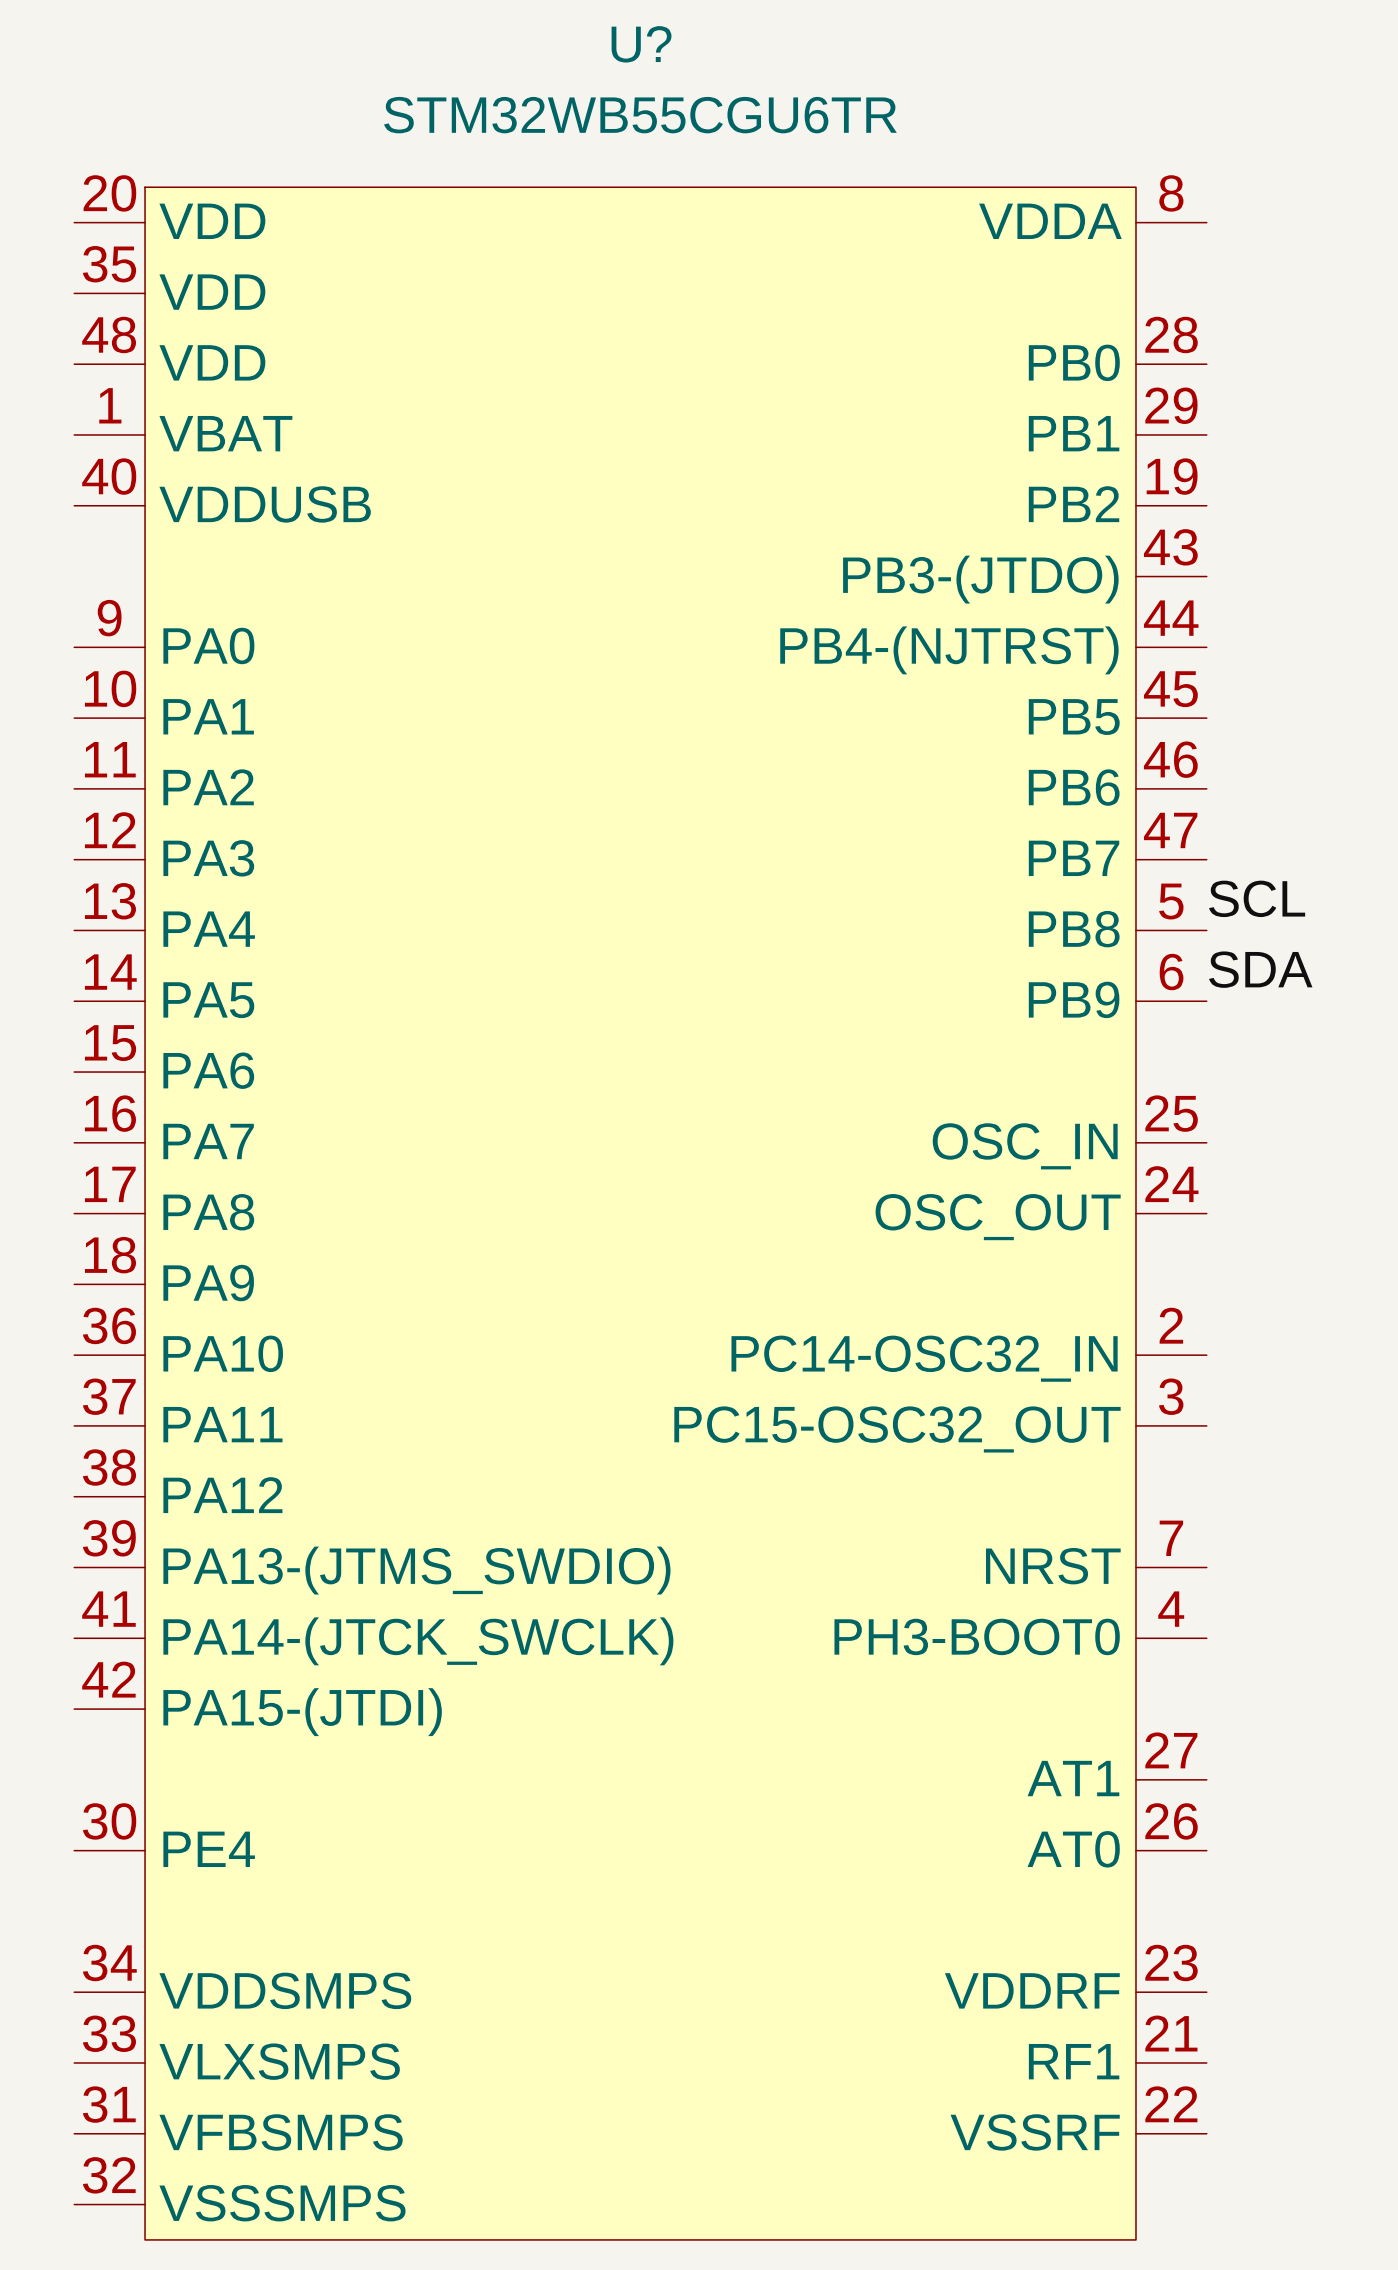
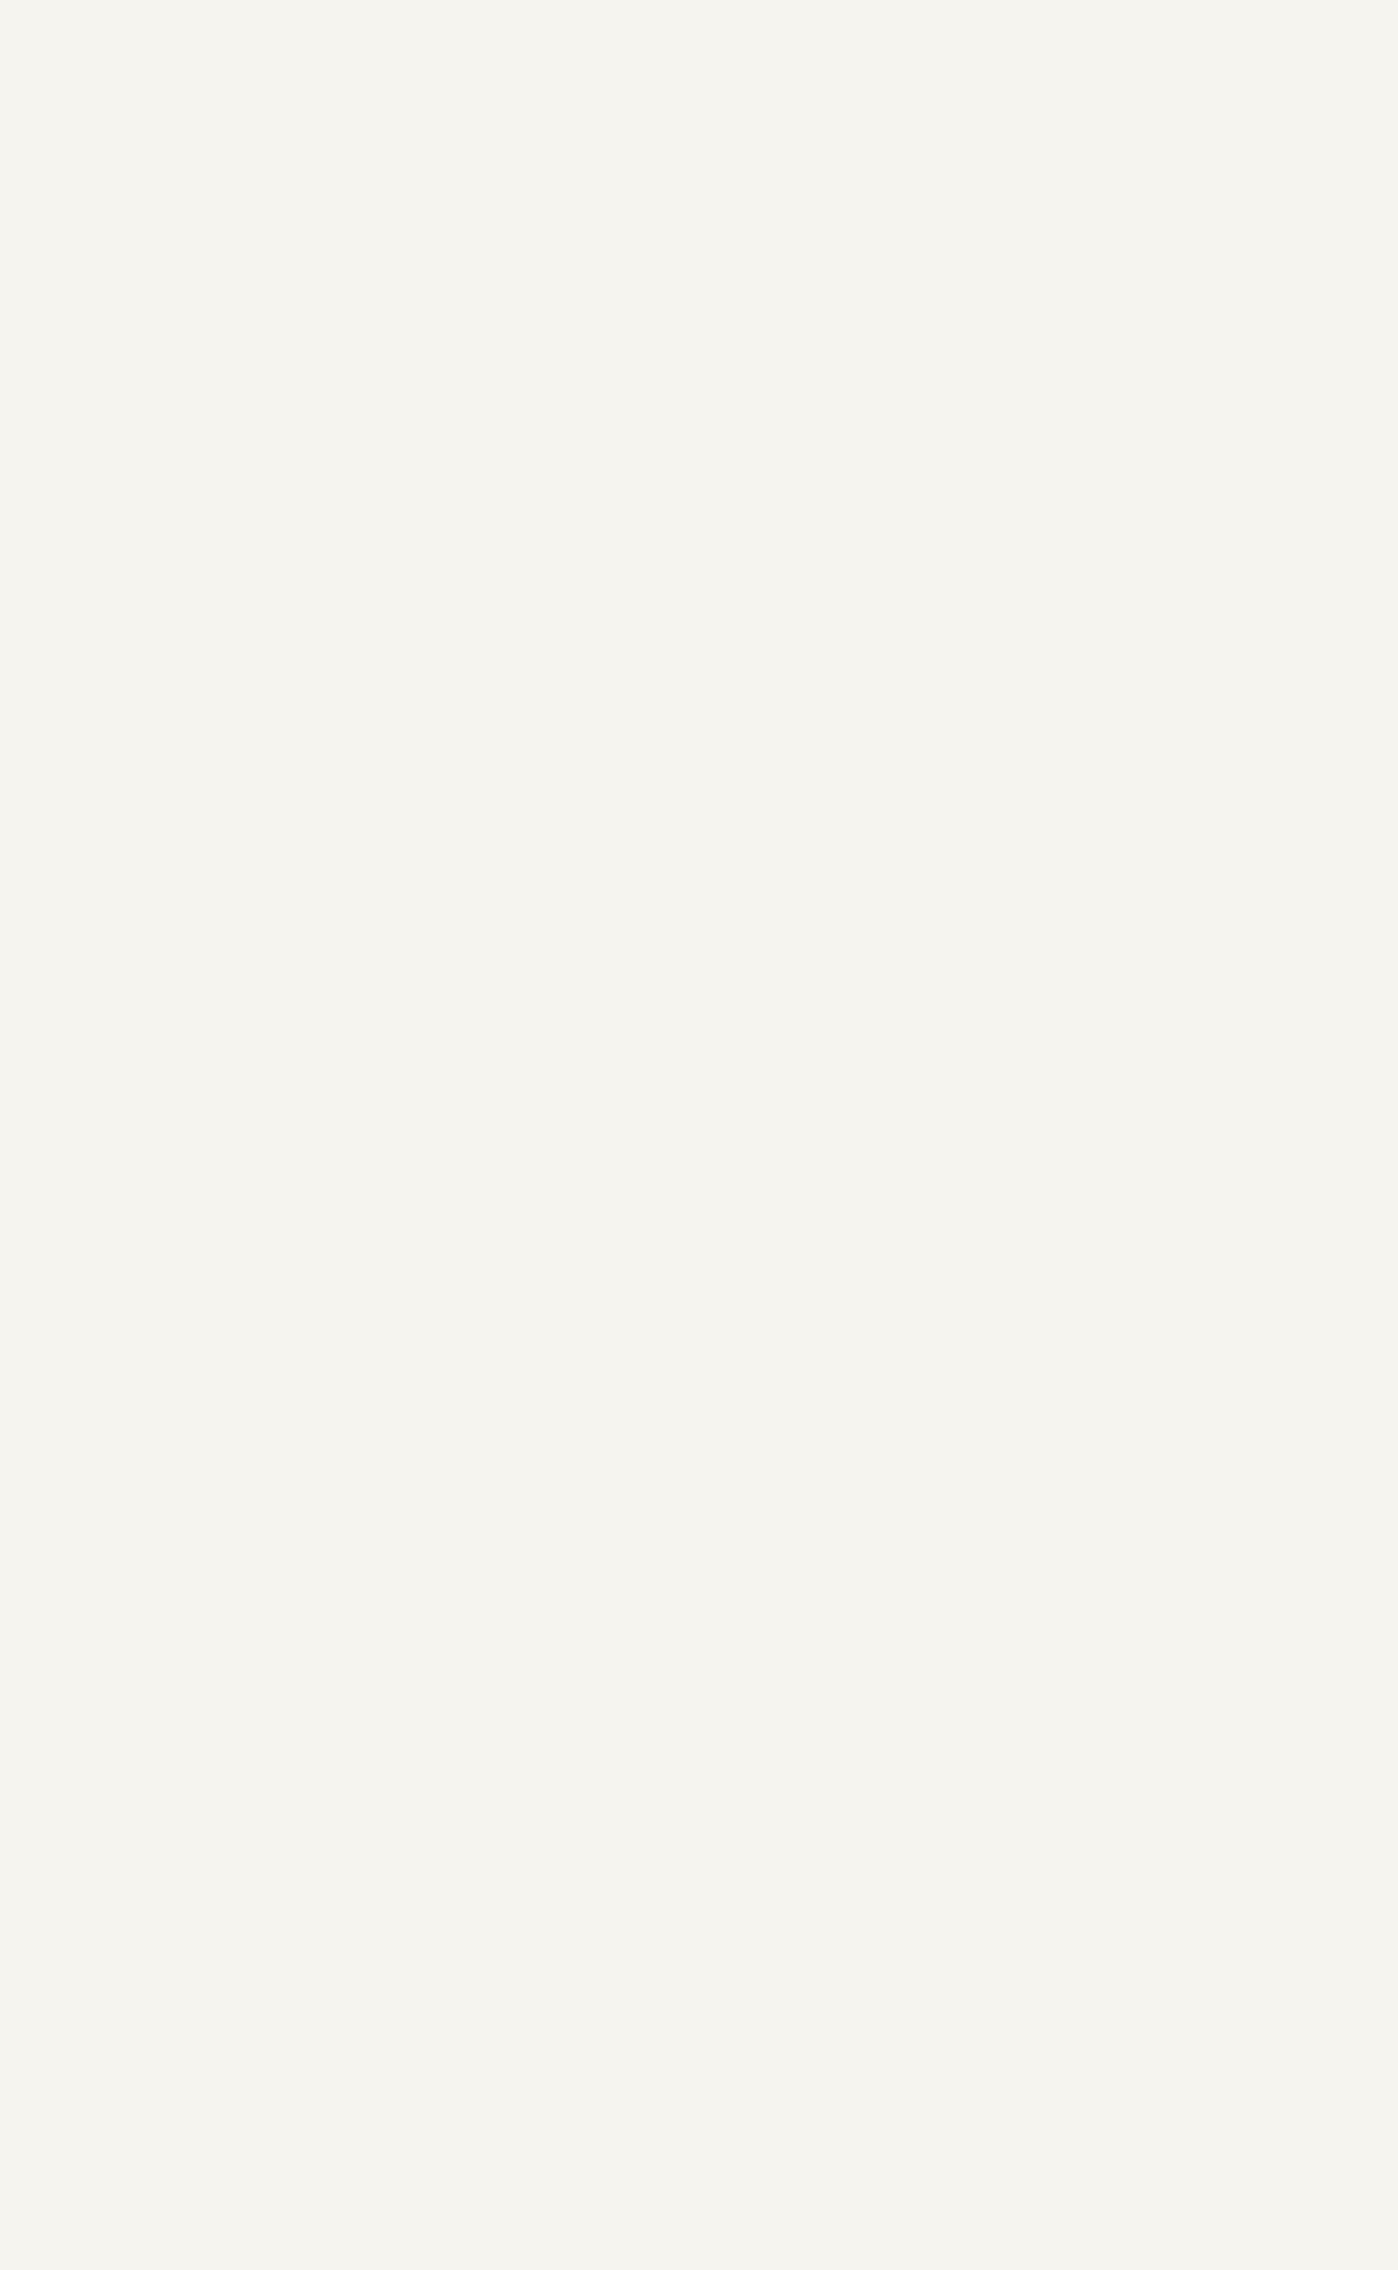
label: SCL (1257, 898) -> none
label: SDA (1260, 969) -> none
U?: (640, 1213) -> none

